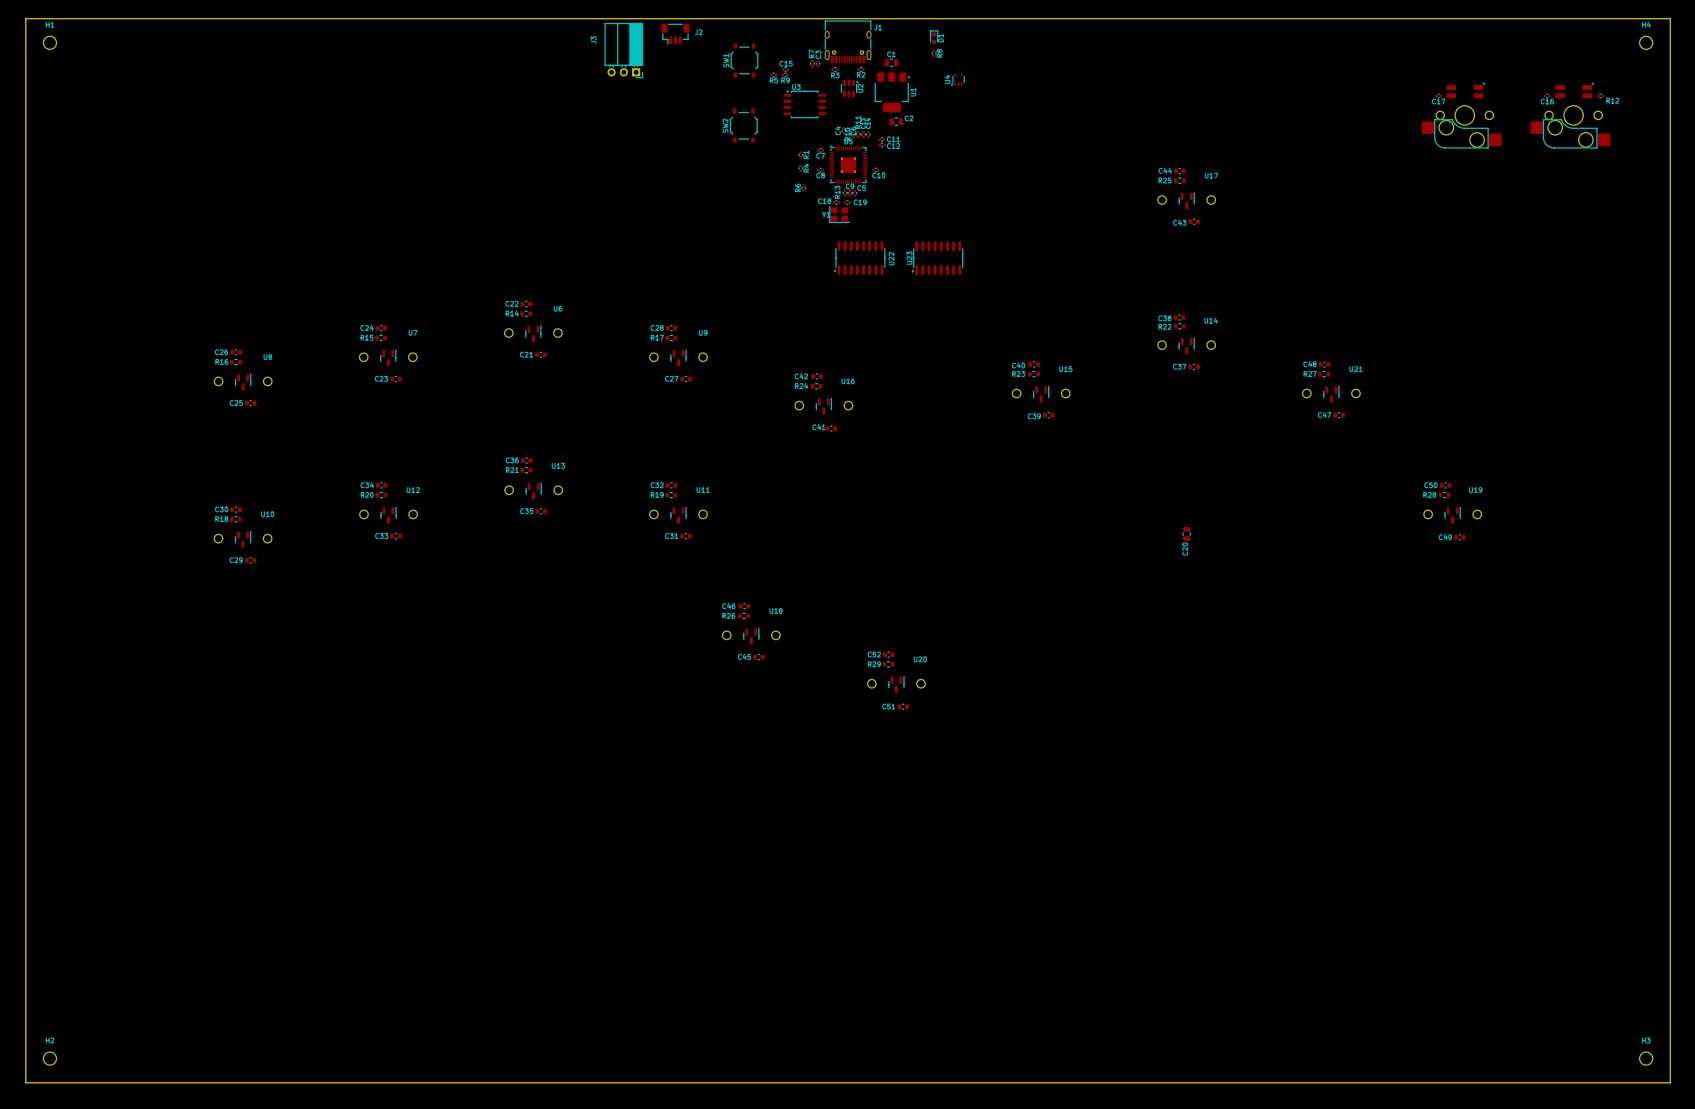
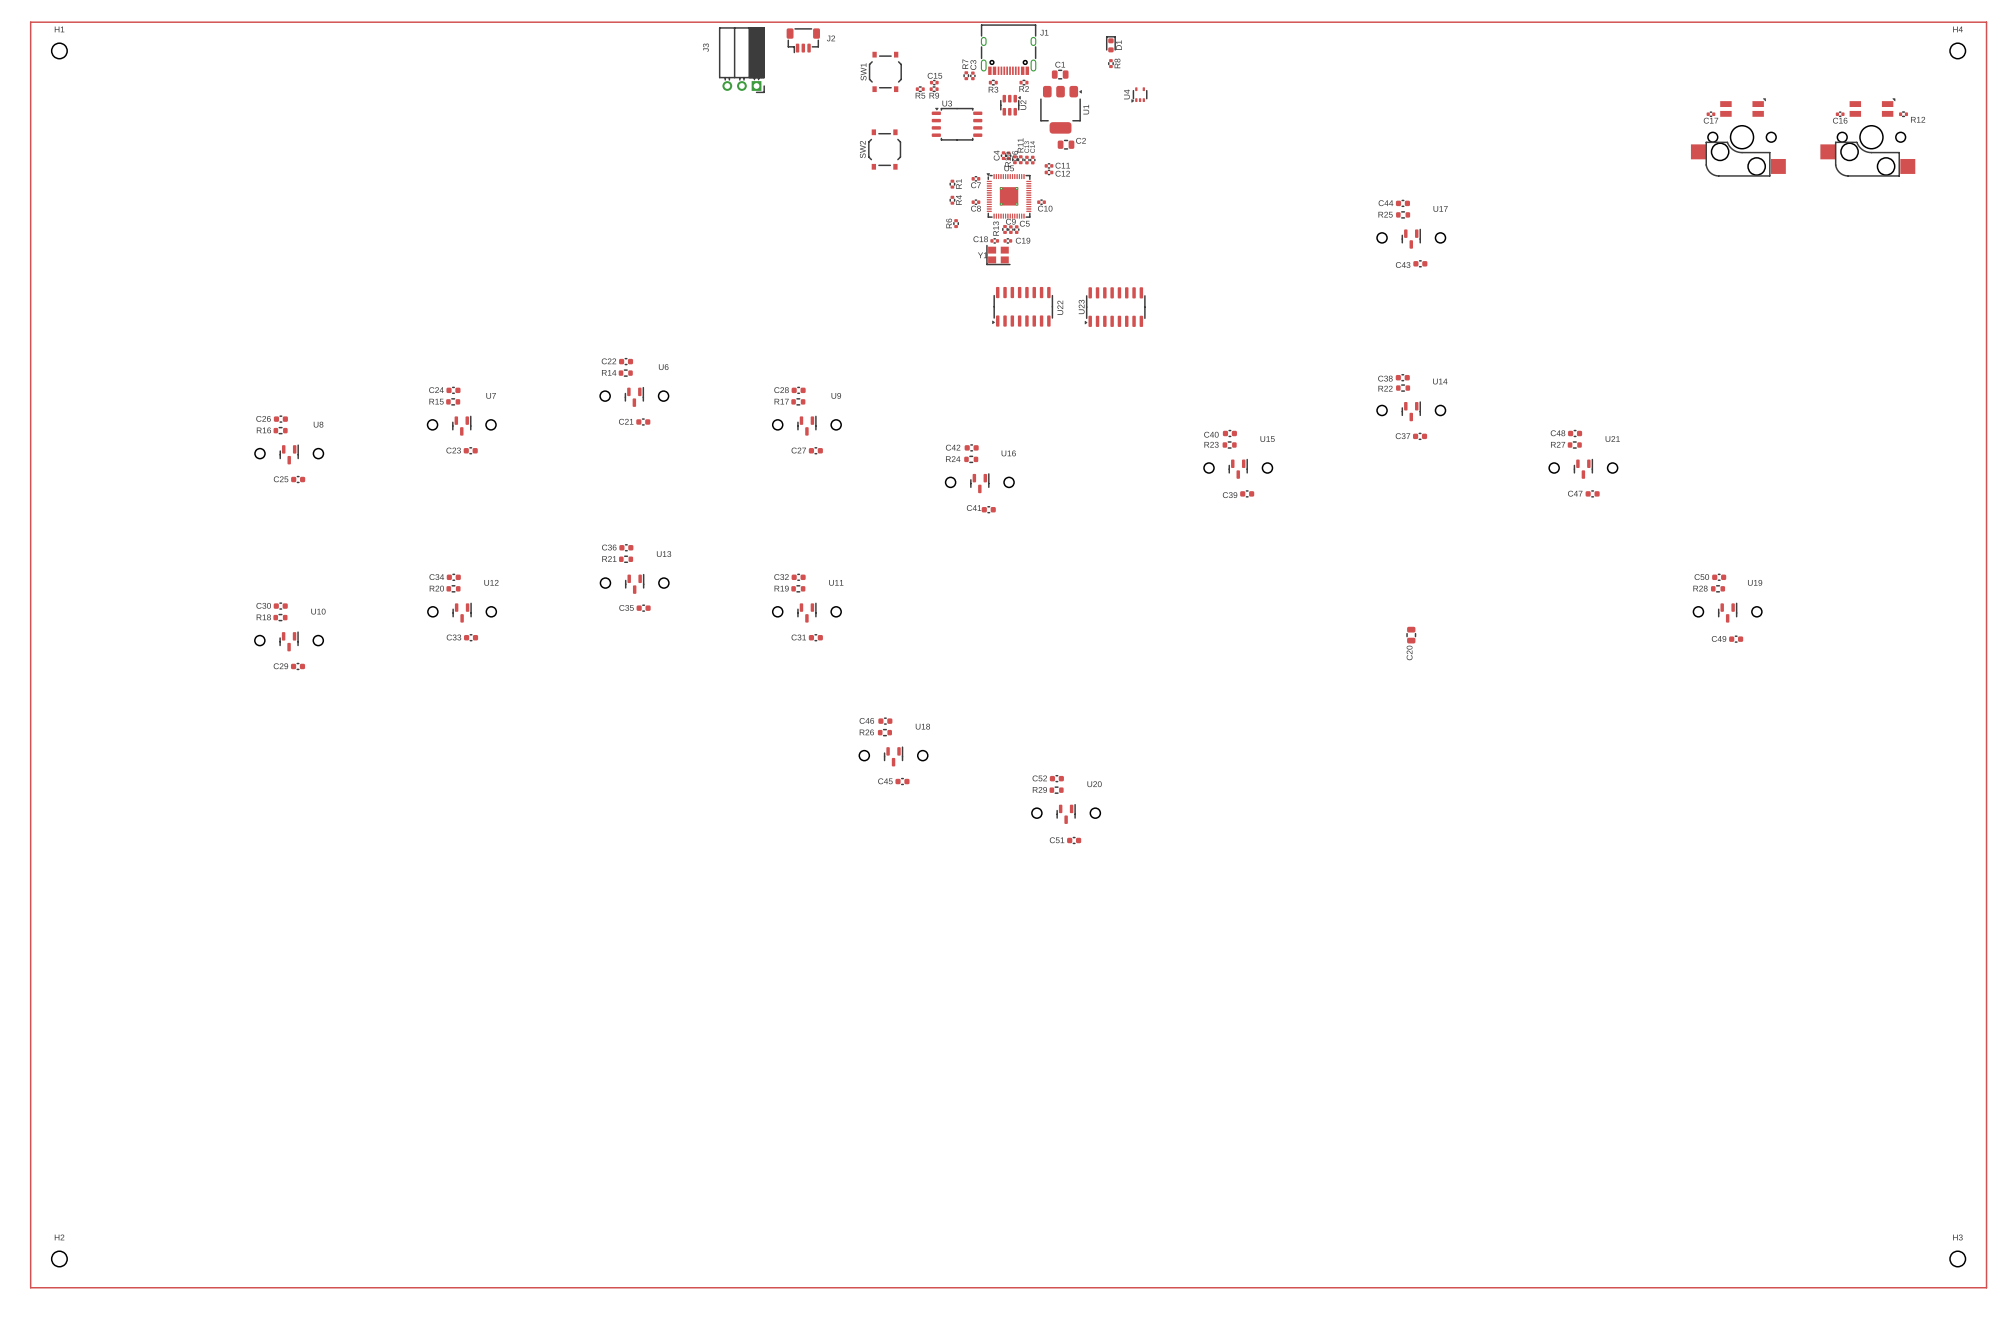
board edge: (25, 18) (1670, 18) (1670, 1082) (25, 1082) (25, 18) -> none

